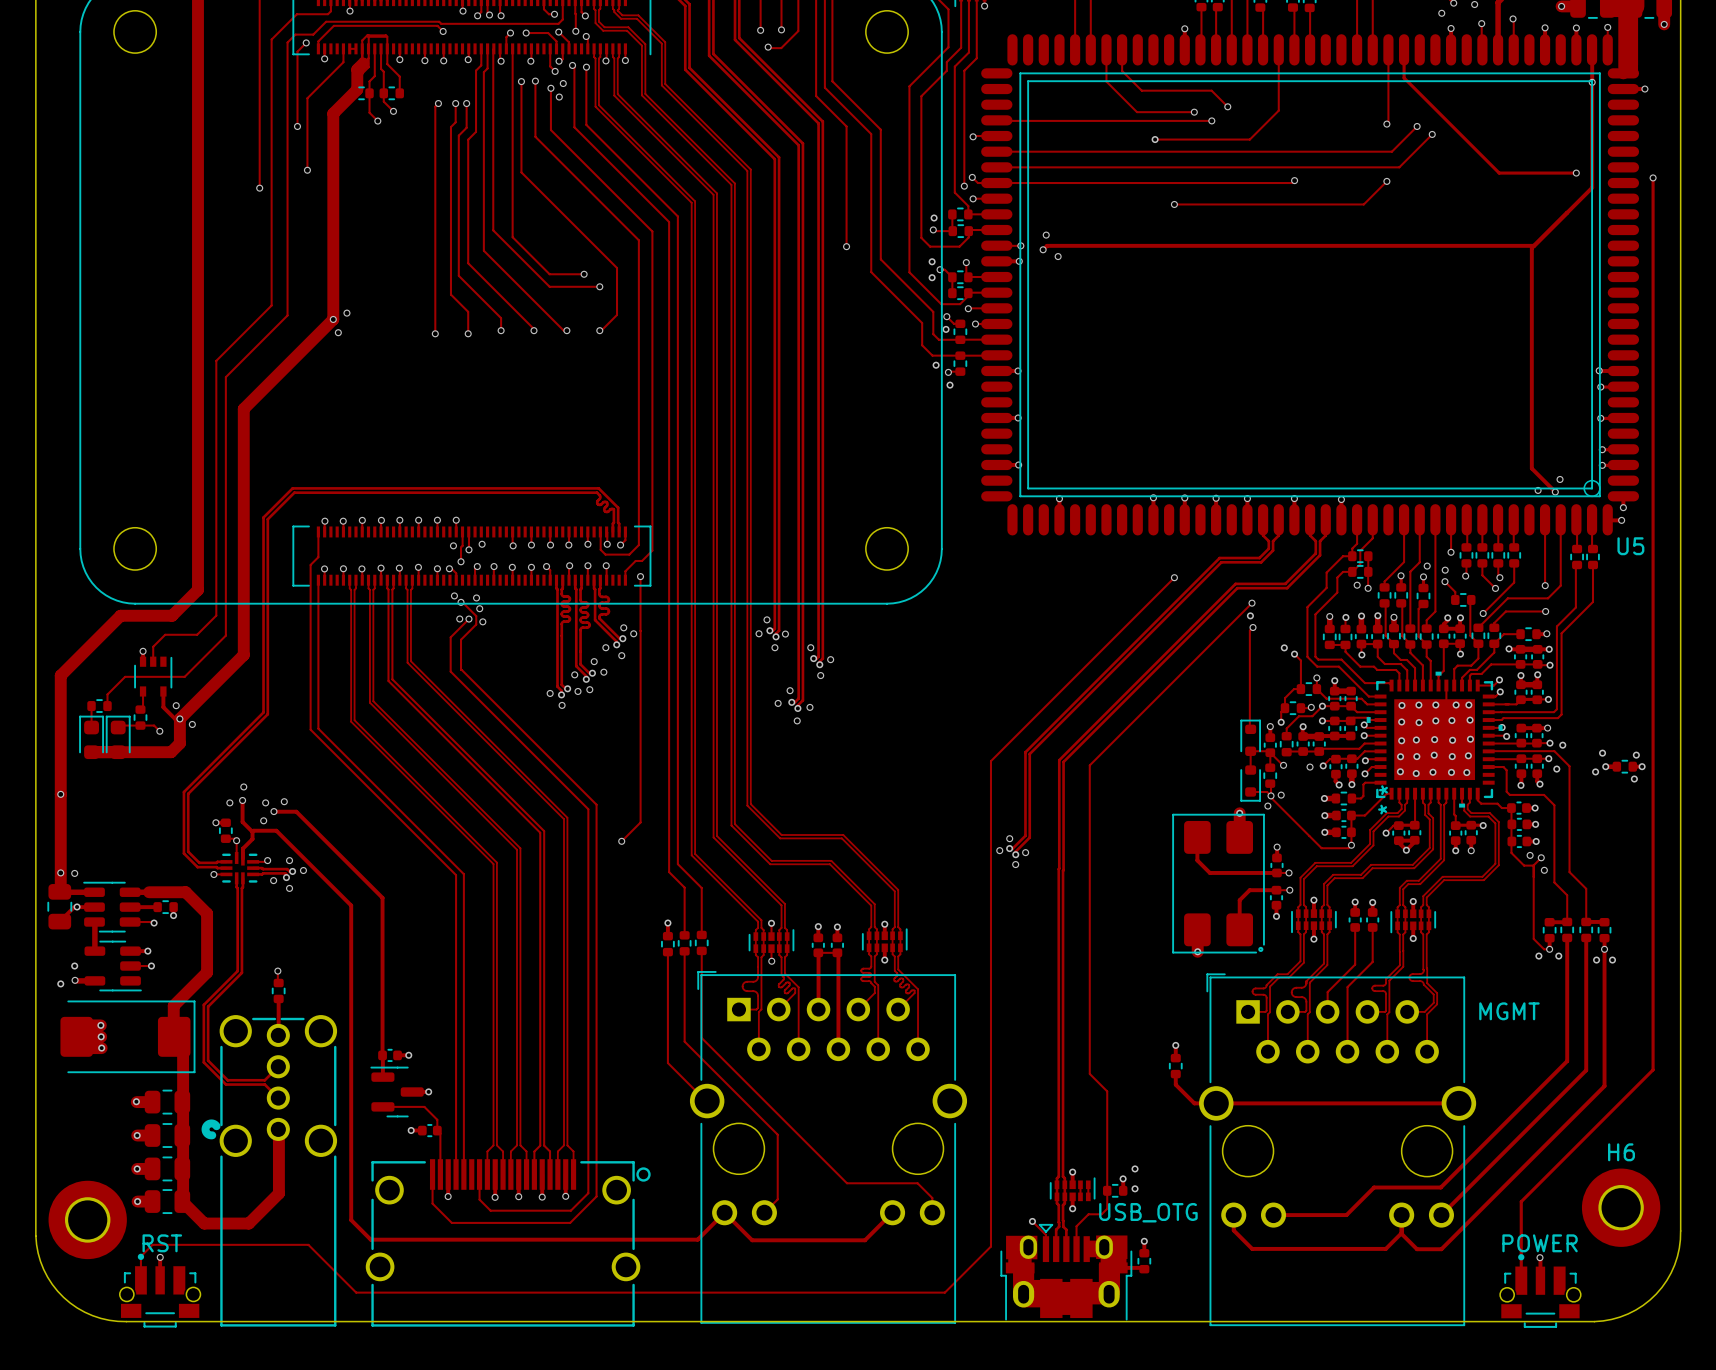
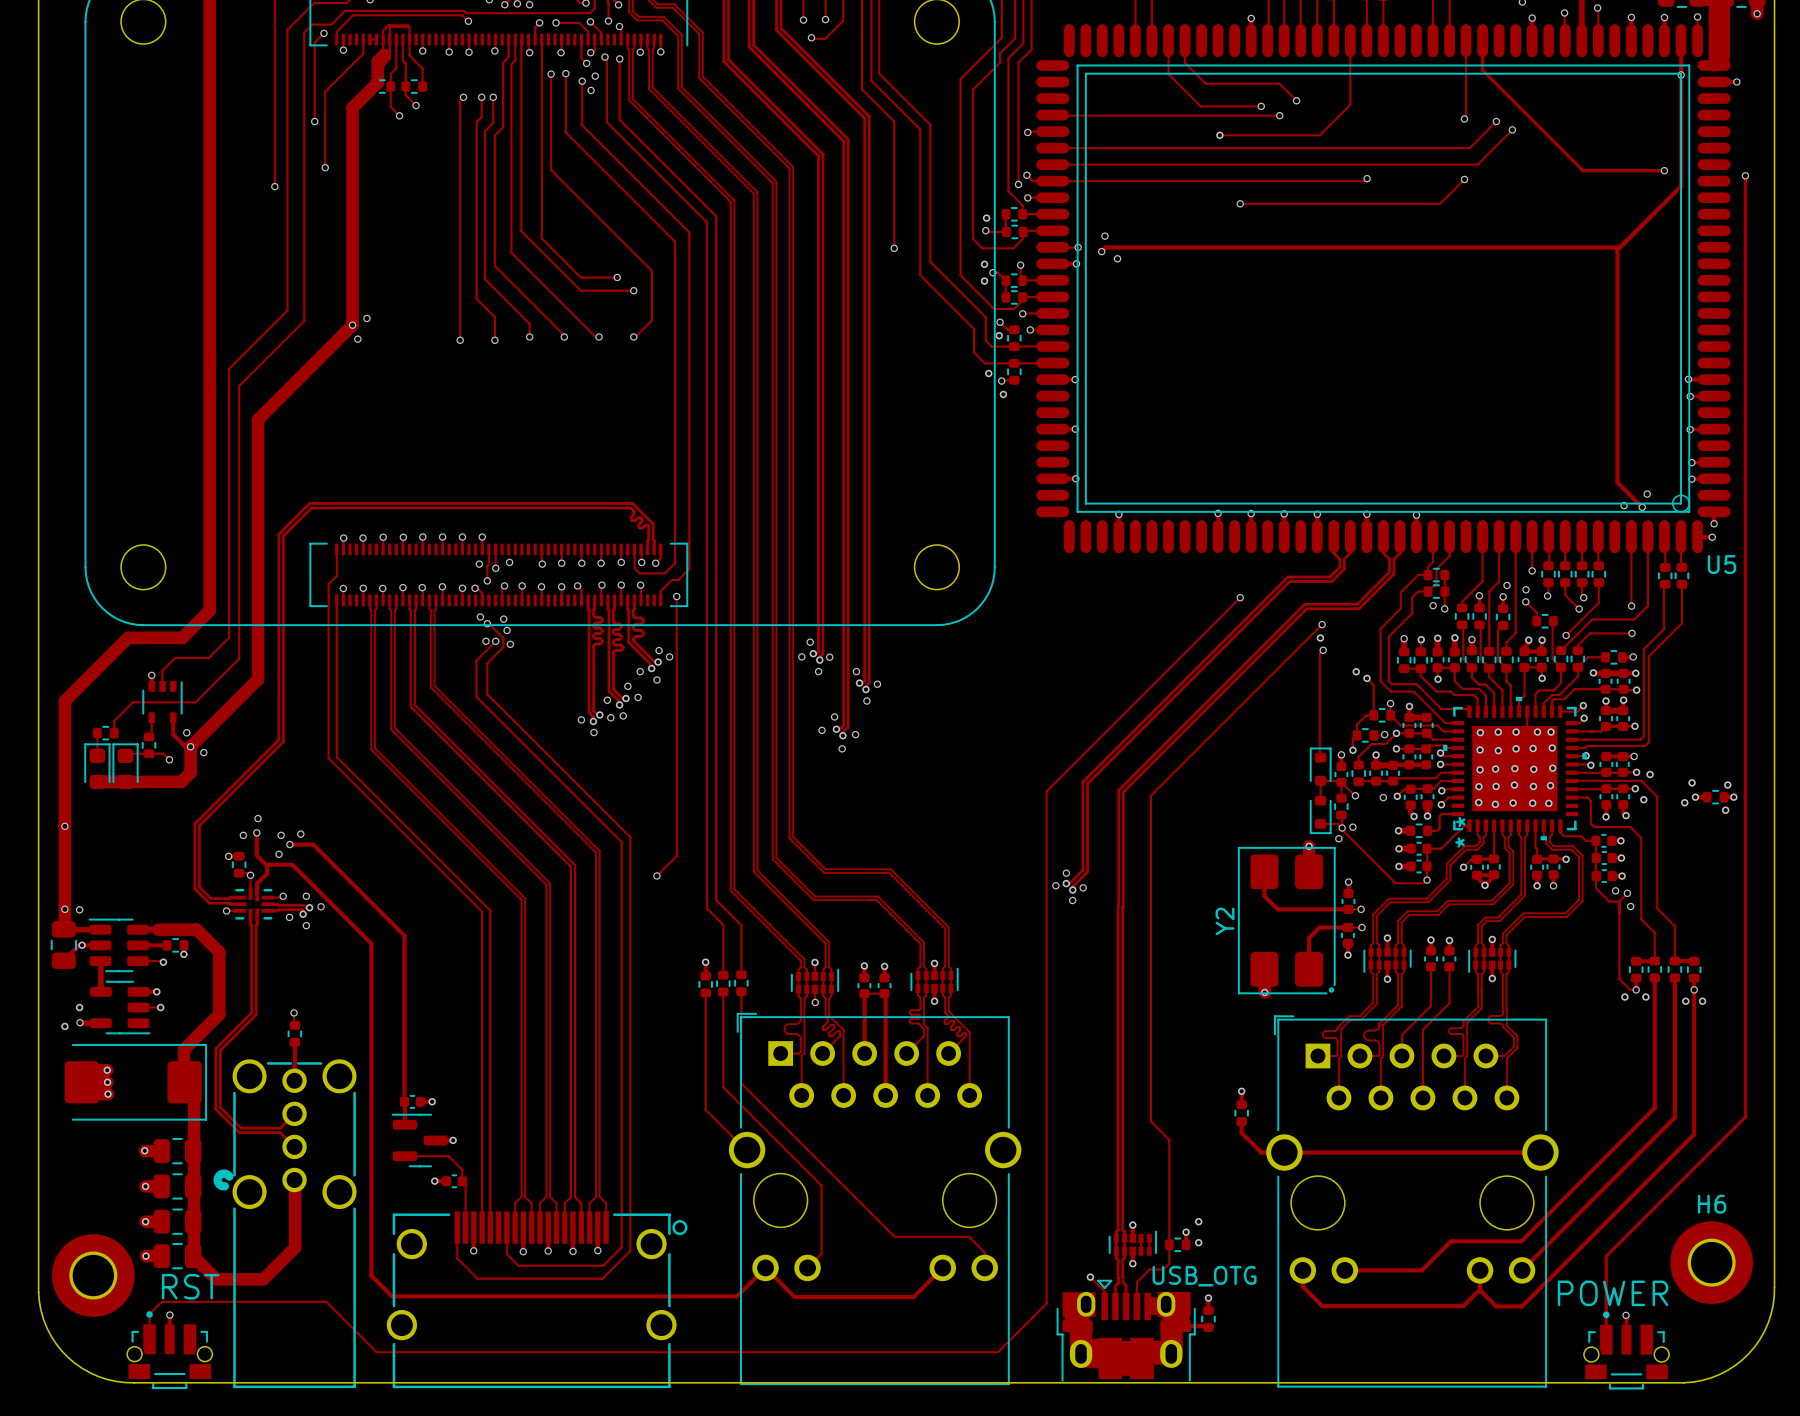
Y2 name: none -> Y2 (1225, 921)
part text: MGMT (1509, 1011) -> none
part text: USB_OTG (1148, 1212) -> none
part value: none -> USB_OTG (1204, 1276)
part value: none -> RST (190, 1286)
part value: none -> POWER (1613, 1293)
part text: RST (162, 1243) -> none
part text: POWER (1540, 1243) -> none

